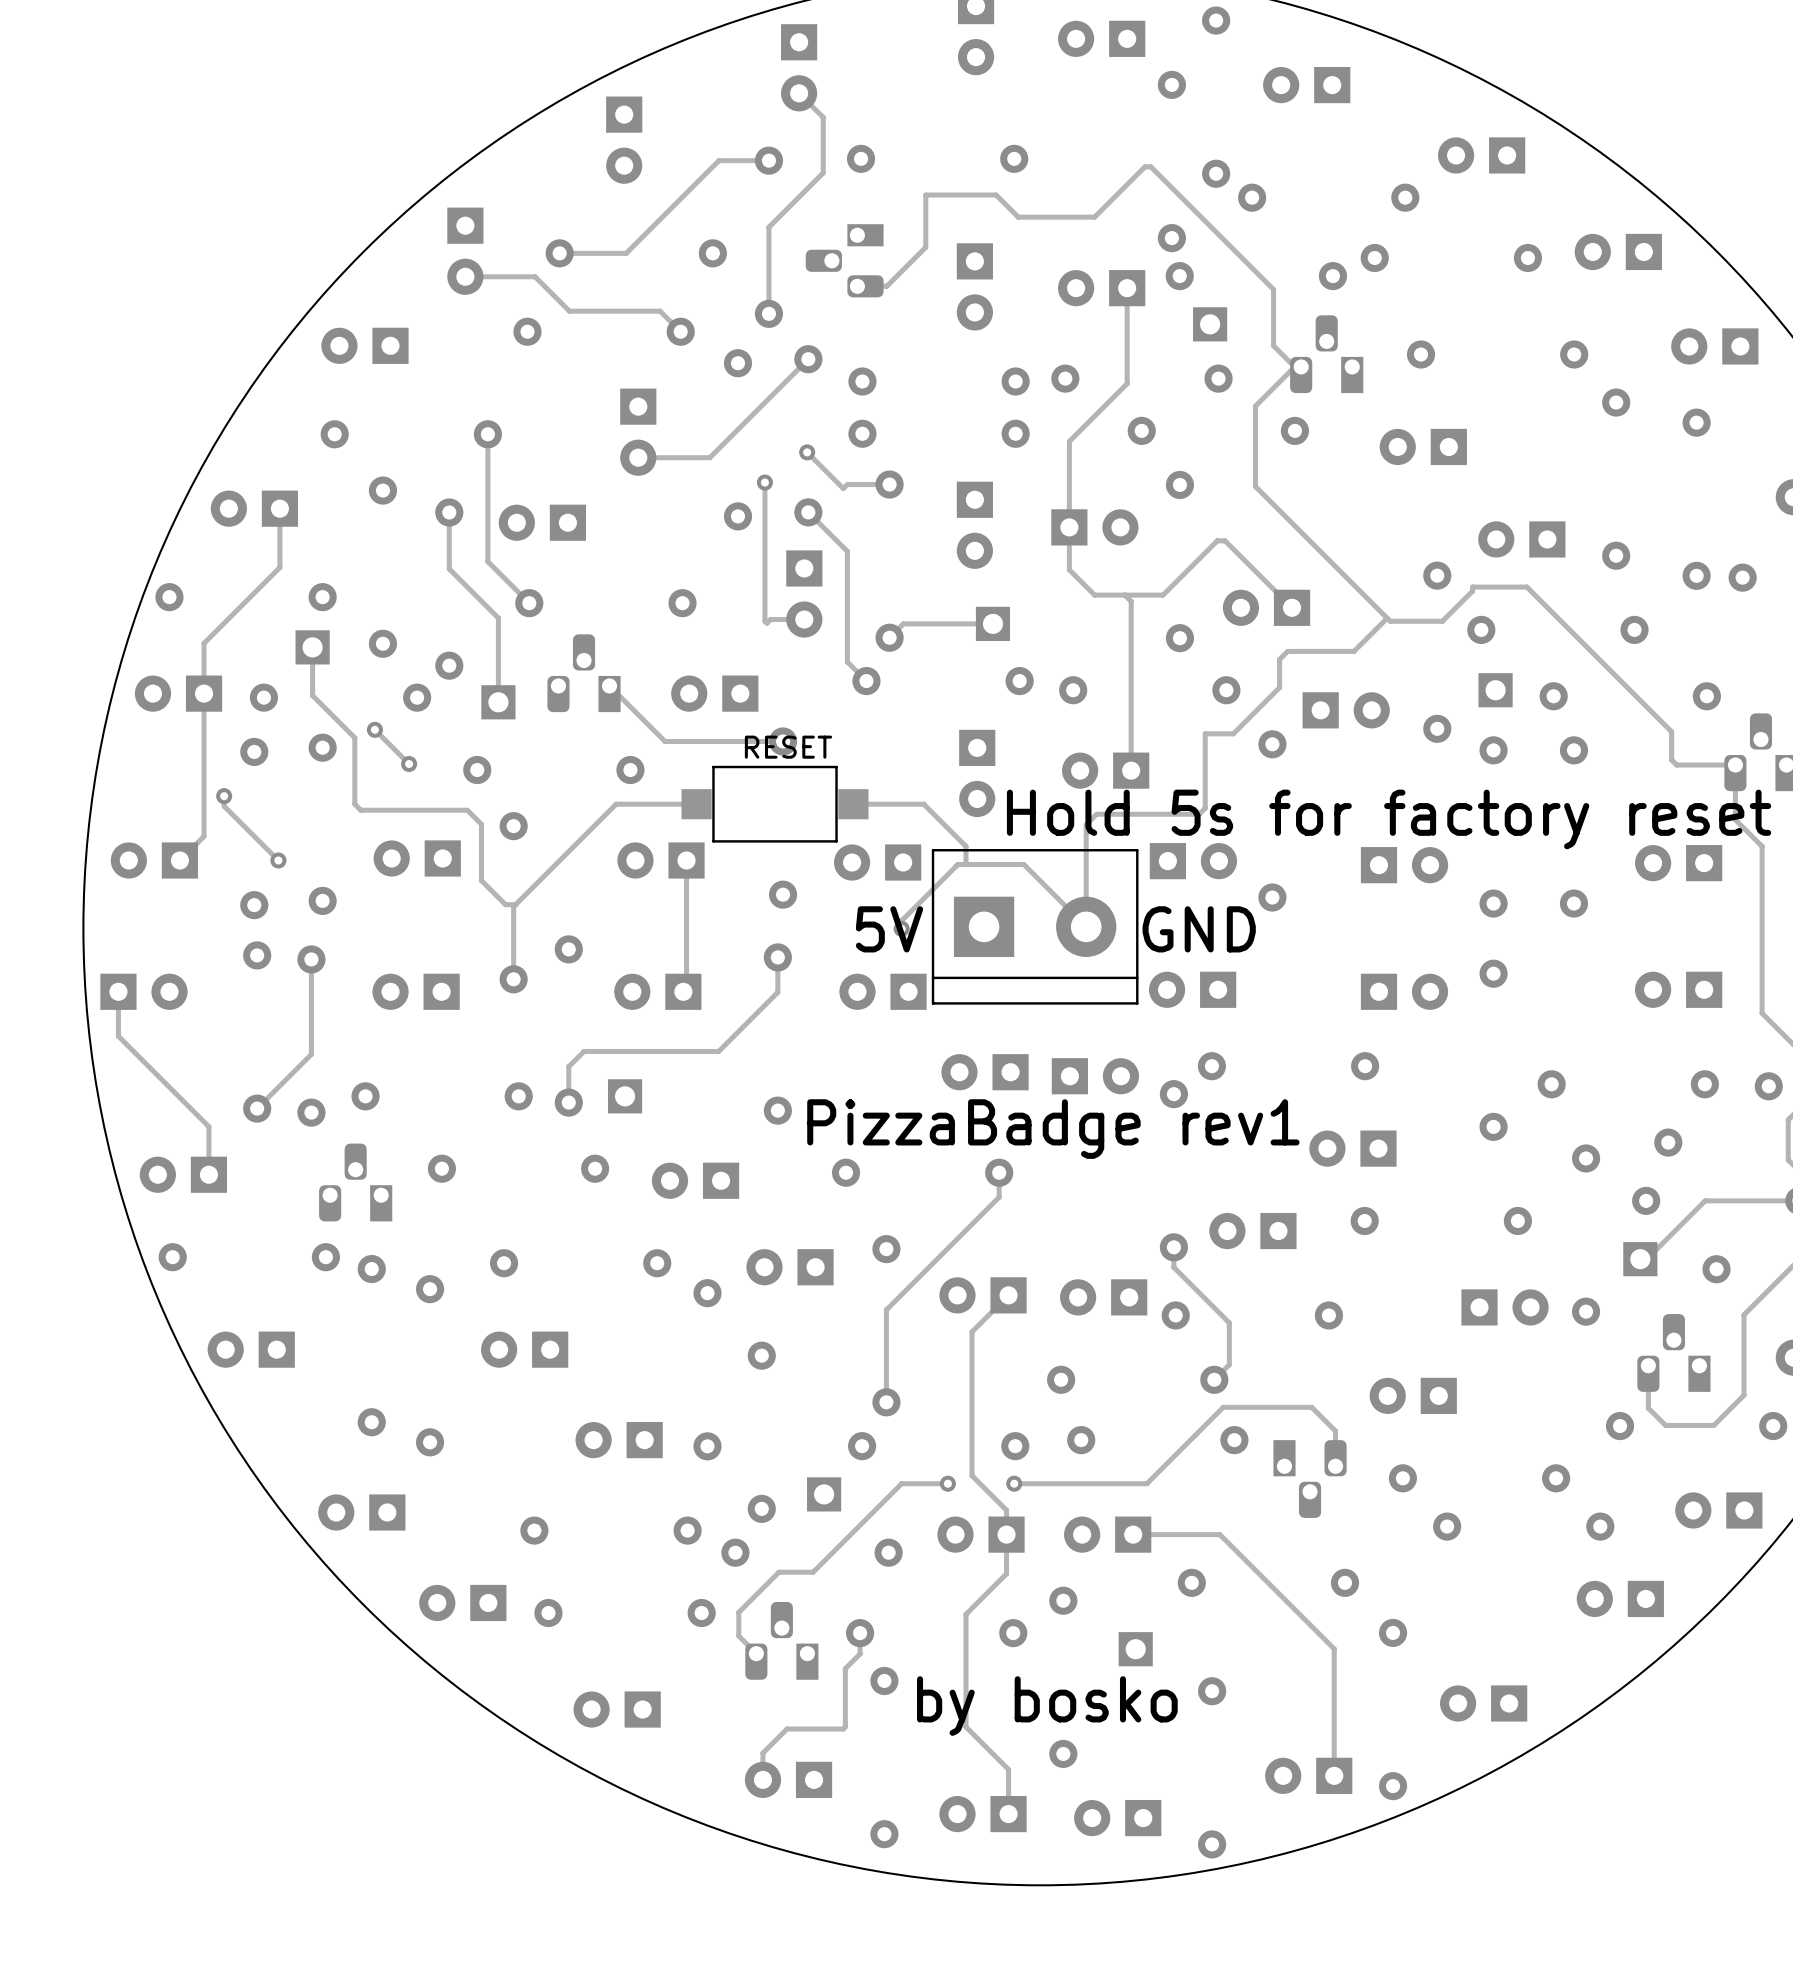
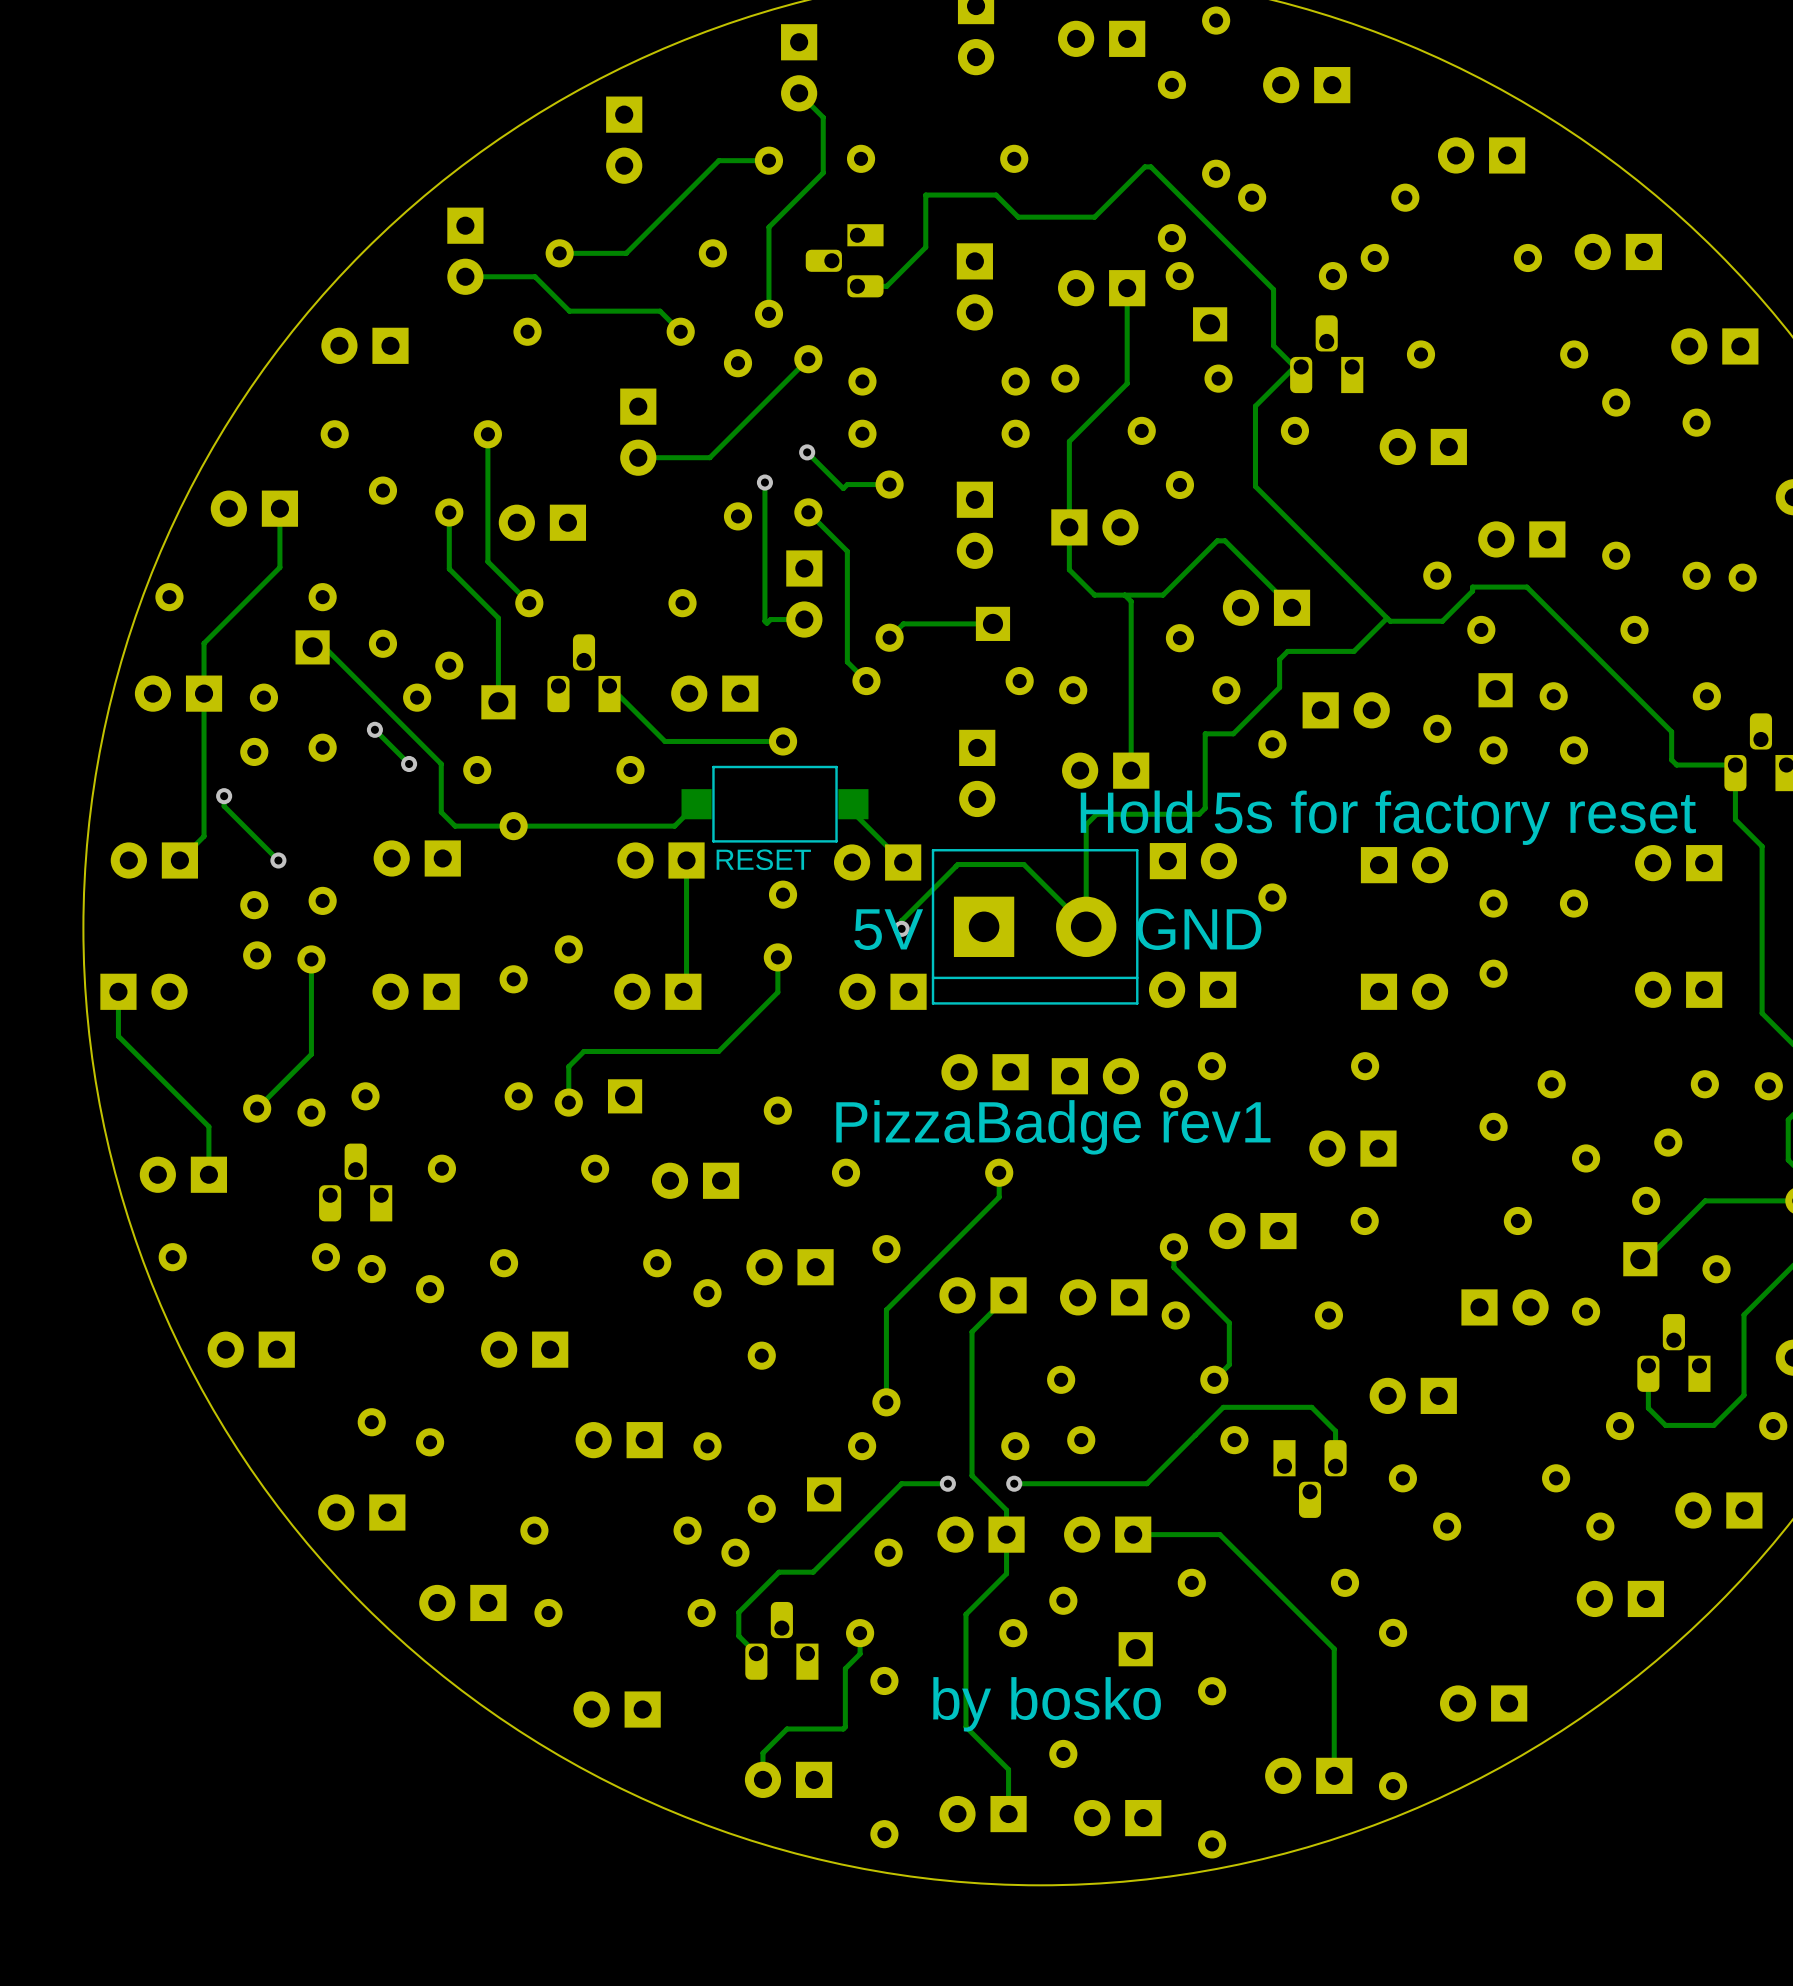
track: (312, 647) (312, 695) (354, 737) (354, 804) (360, 810) (467, 810) (481, 824) (481, 880) (505, 904) (515, 904) -> (312, 647) (324, 647) (441, 763) (441, 812) (455, 826) (674, 826) (696, 804)
part value position: RESET (788, 747) -> RESET (763, 859)
track: (696, 804) (616, 804) (513, 906) (513, 979) -> none
track: (853, 804) (923, 804) (965, 846) (965, 864) -> (853, 804) (853, 812) (903, 862)

